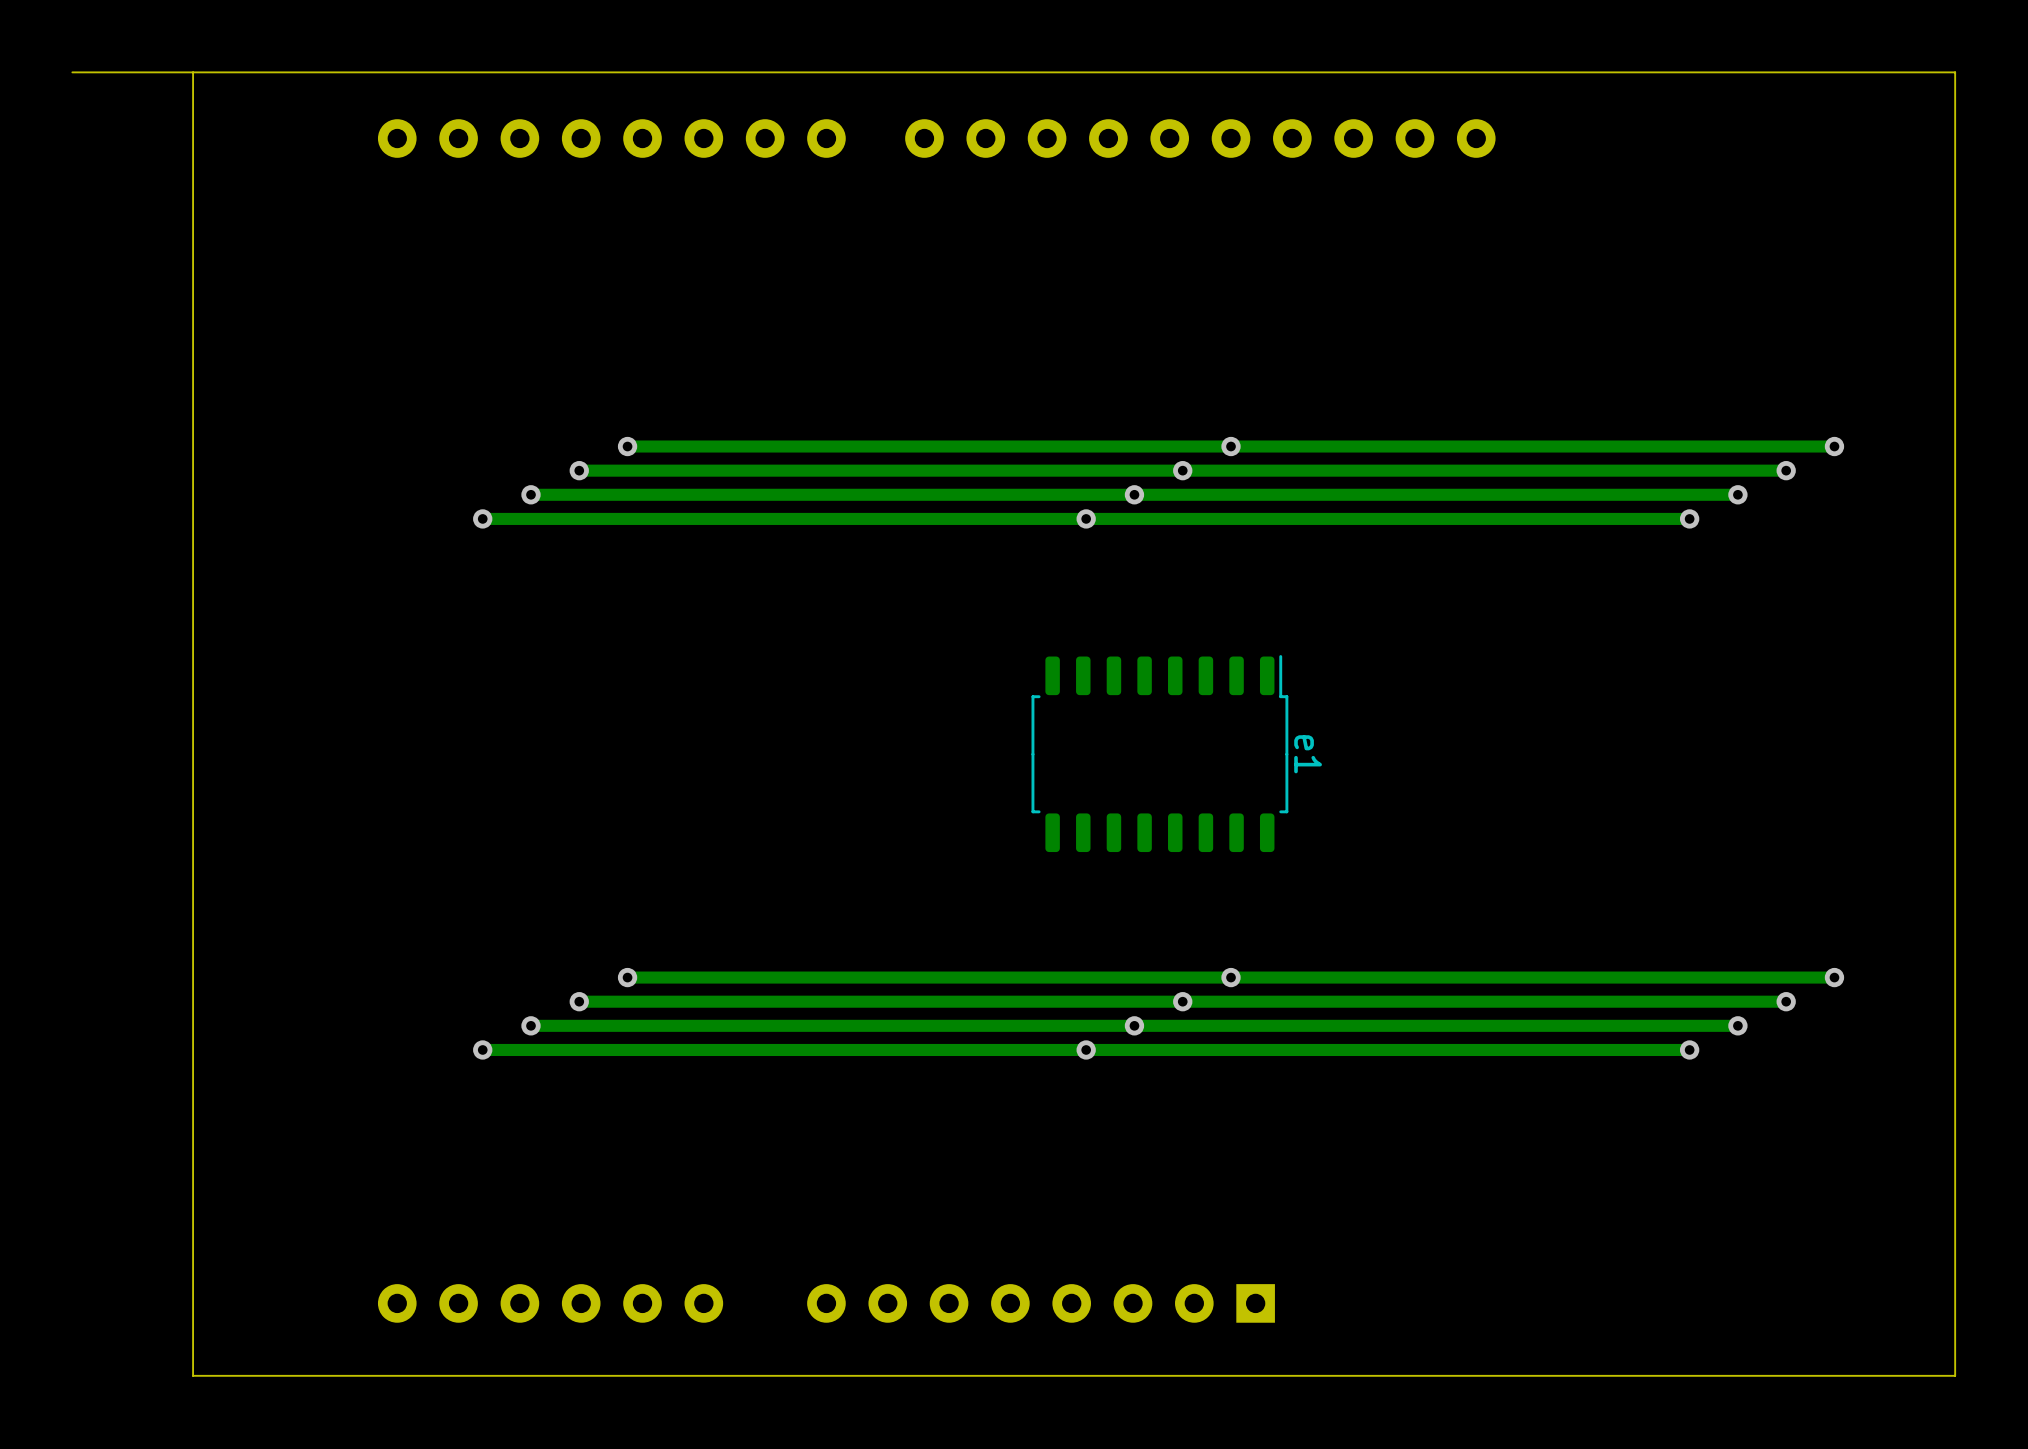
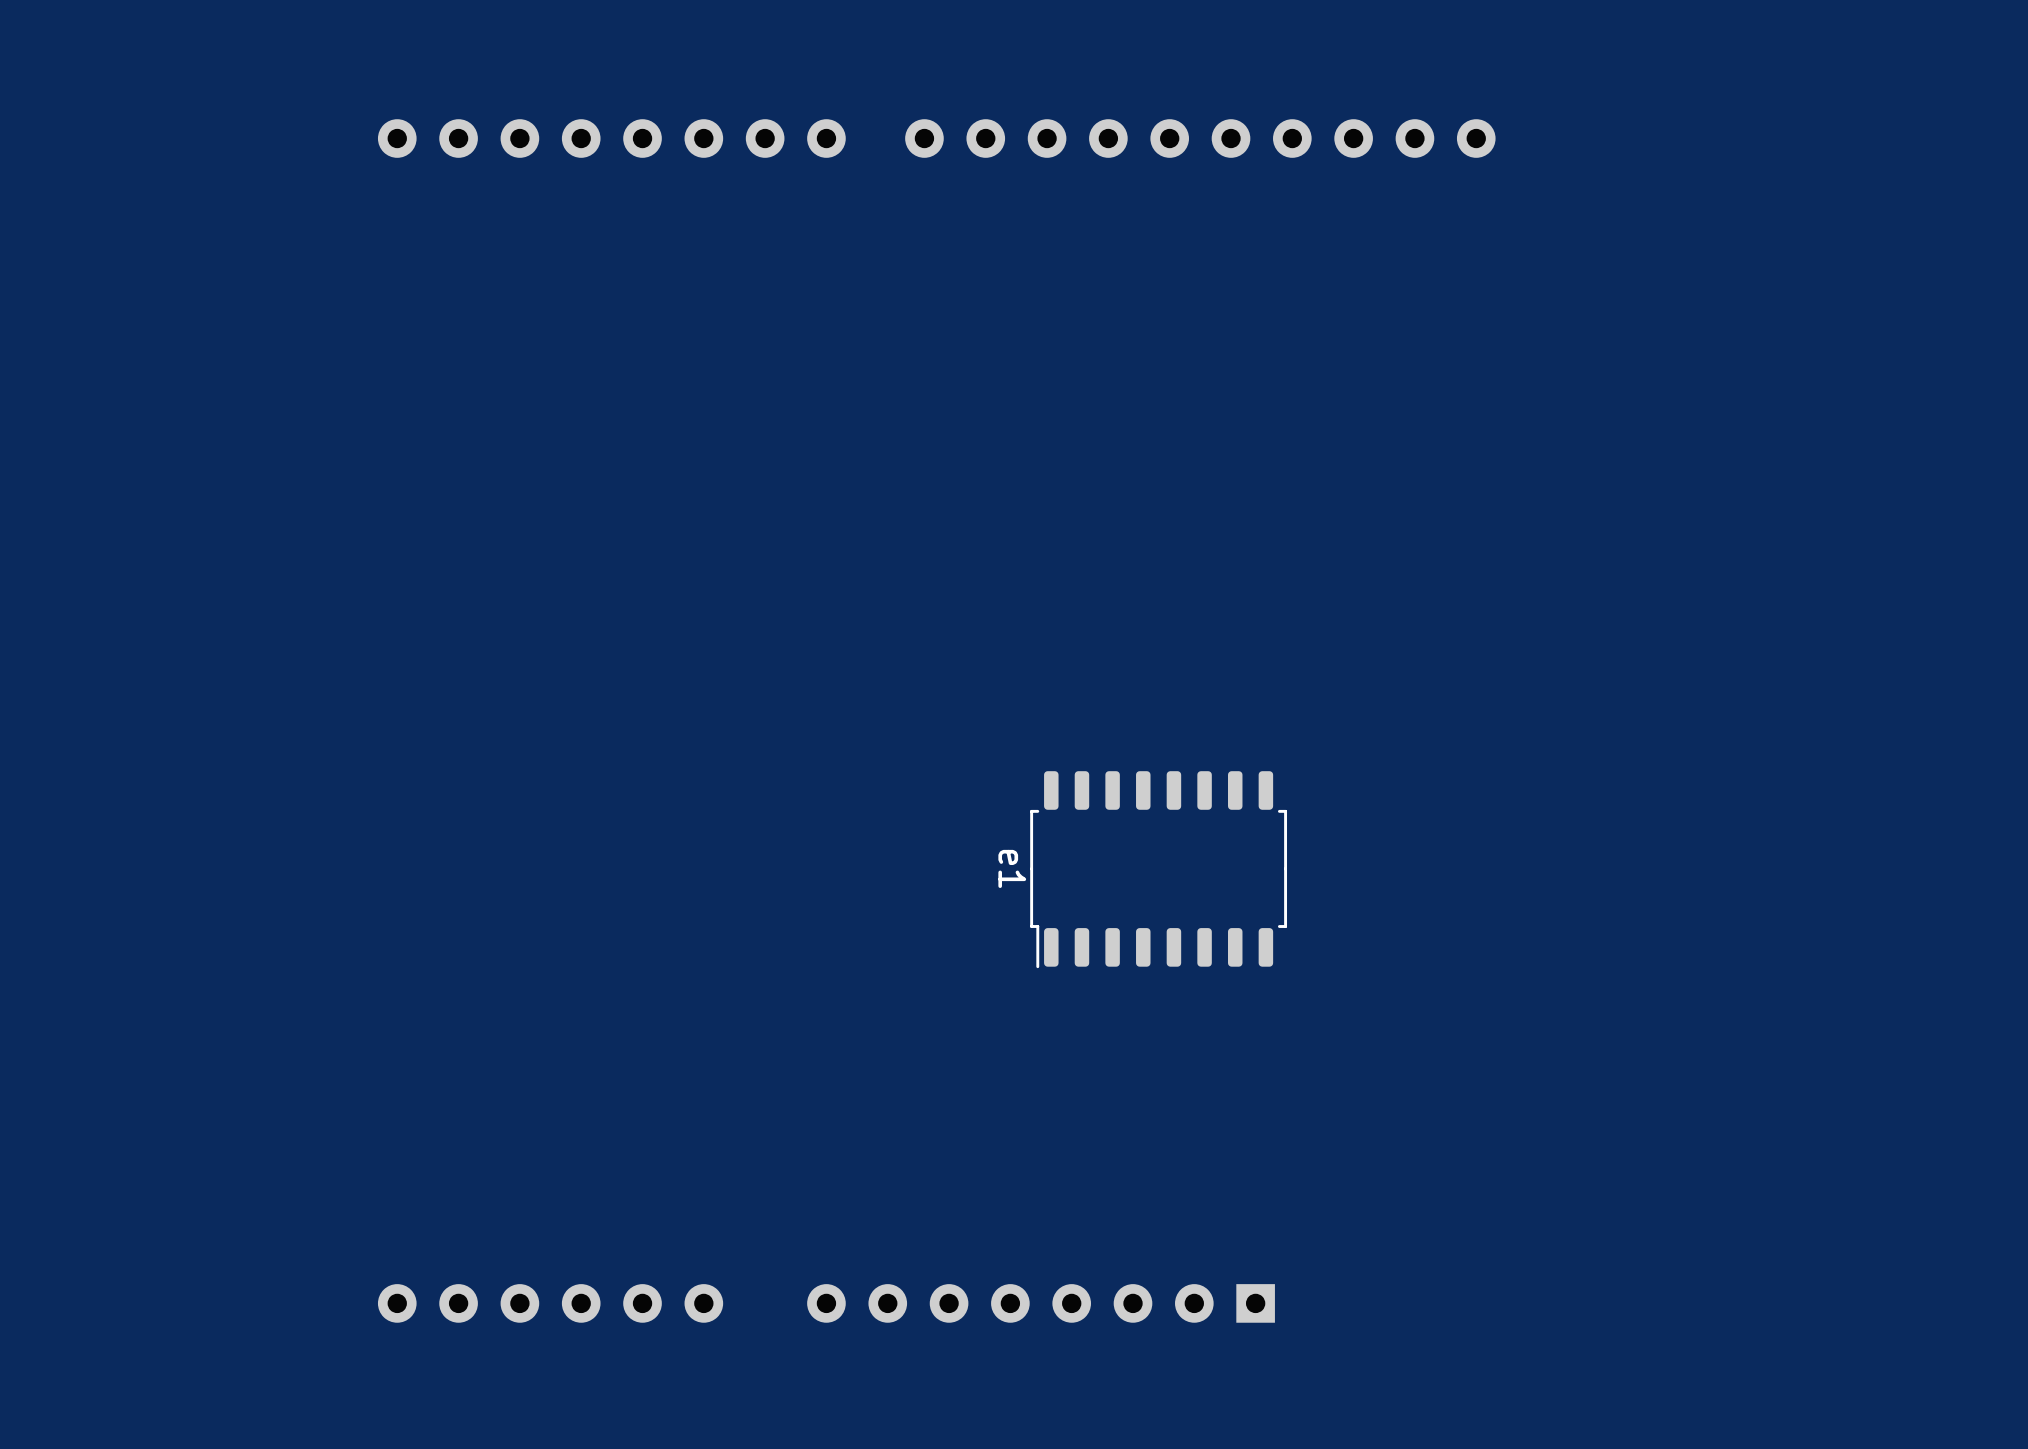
board edge: (193, 72) (193, 1375) (1955, 1375) (1955, 72) (72, 72) -> none
via: (627, 446) -> none
via: (1231, 446) -> none
track: (1834, 446) (627, 446) -> none
via: (1834, 446) -> none
via: (579, 470) -> none
via: (1182, 470) -> none
track: (1786, 470) (579, 470) -> none
via: (1786, 470) -> none
via: (531, 494) -> none
via: (1134, 494) -> none
track: (1737, 494) (531, 494) -> none
via: (1737, 494) -> none
via: (482, 518) -> none
via: (1086, 518) -> none
track: (1689, 518) (482, 518) -> none
via: (1689, 518) -> none
e1 rotation: 0° (1159, 753) -> 180° (1158, 869)
via: (627, 977) -> none
via: (1231, 977) -> none
track: (1834, 977) (627, 977) -> none
via: (1834, 977) -> none
via: (579, 1001) -> none
via: (1182, 1001) -> none
track: (1786, 1001) (579, 1001) -> none
via: (1786, 1001) -> none
via: (531, 1025) -> none
via: (1134, 1025) -> none
track: (1737, 1025) (531, 1025) -> none
via: (1737, 1025) -> none
via: (482, 1049) -> none
via: (1086, 1049) -> none
track: (1689, 1049) (482, 1049) -> none
via: (1689, 1049) -> none

